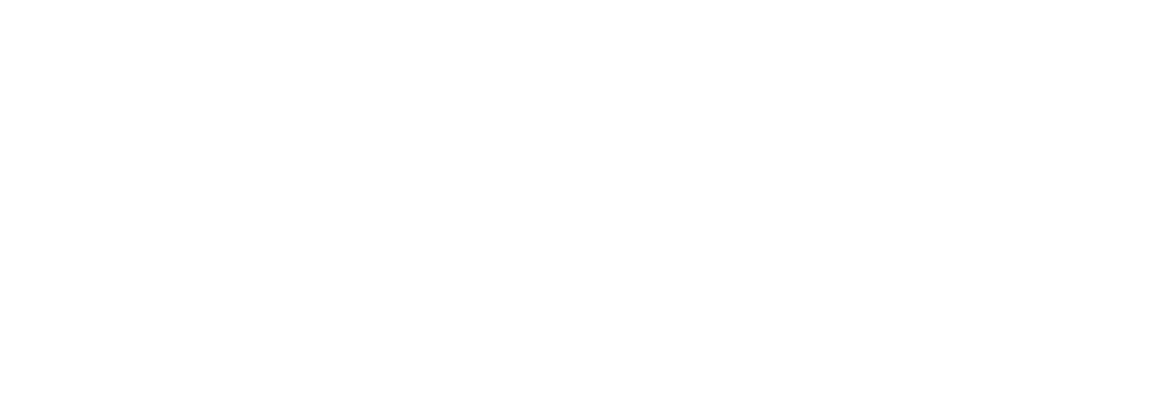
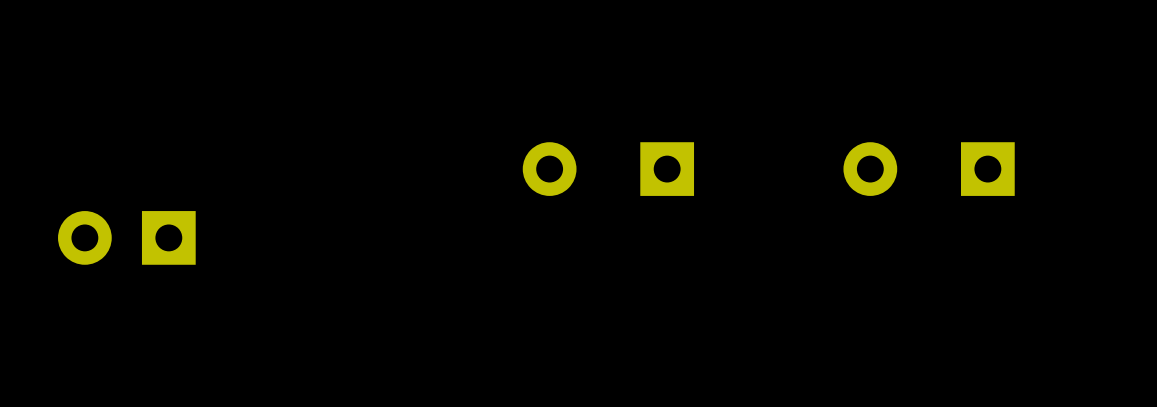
part: none -> (608, 169)
part: none -> (929, 169)
part: none -> (126, 237)

